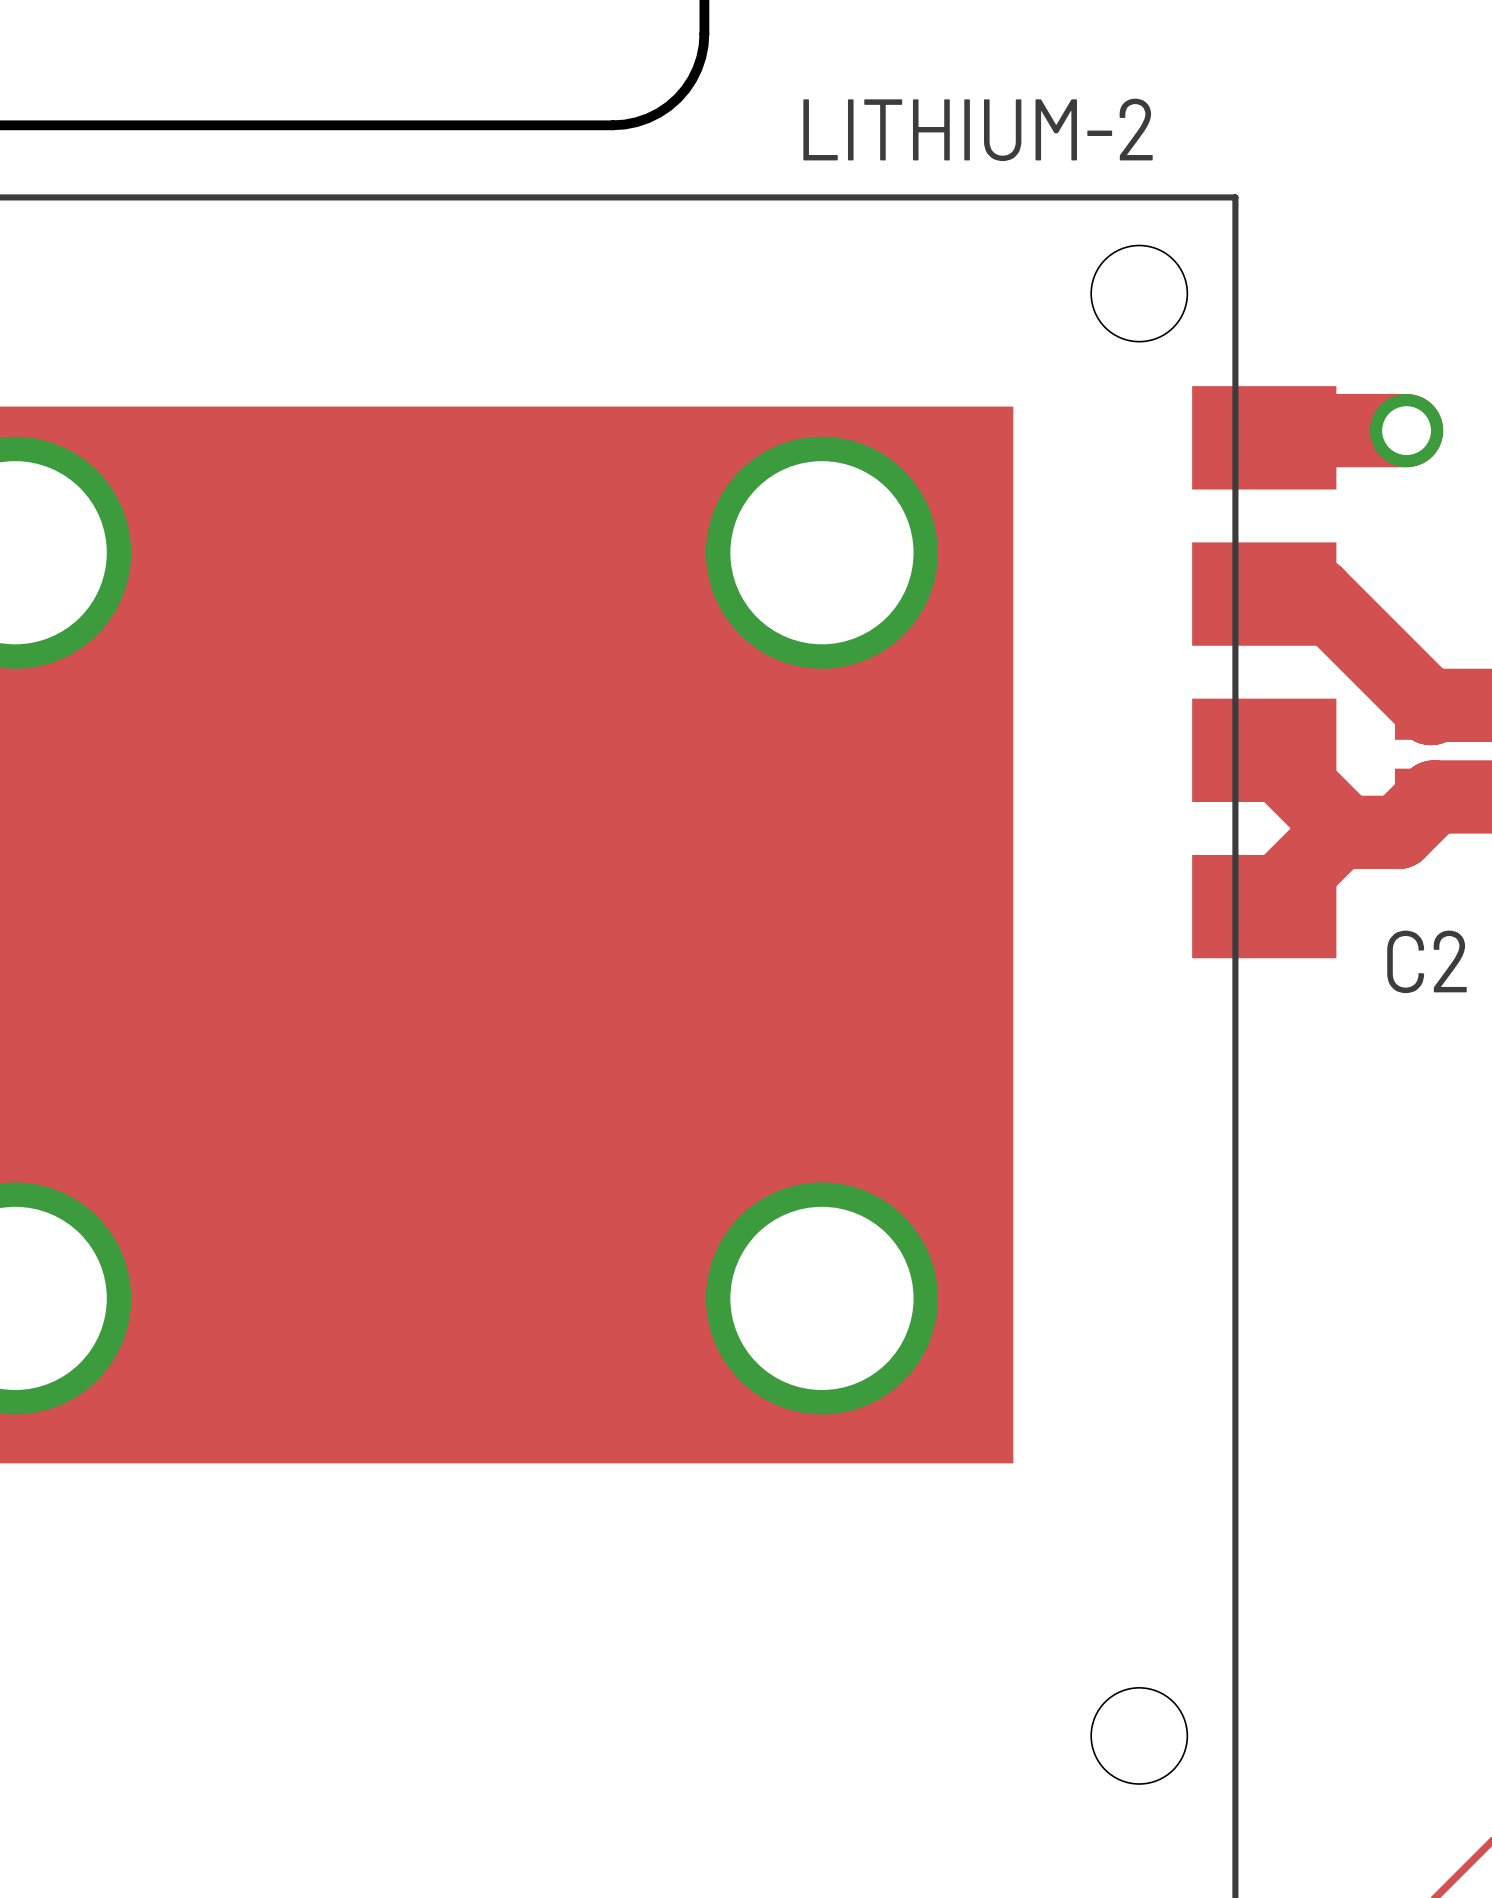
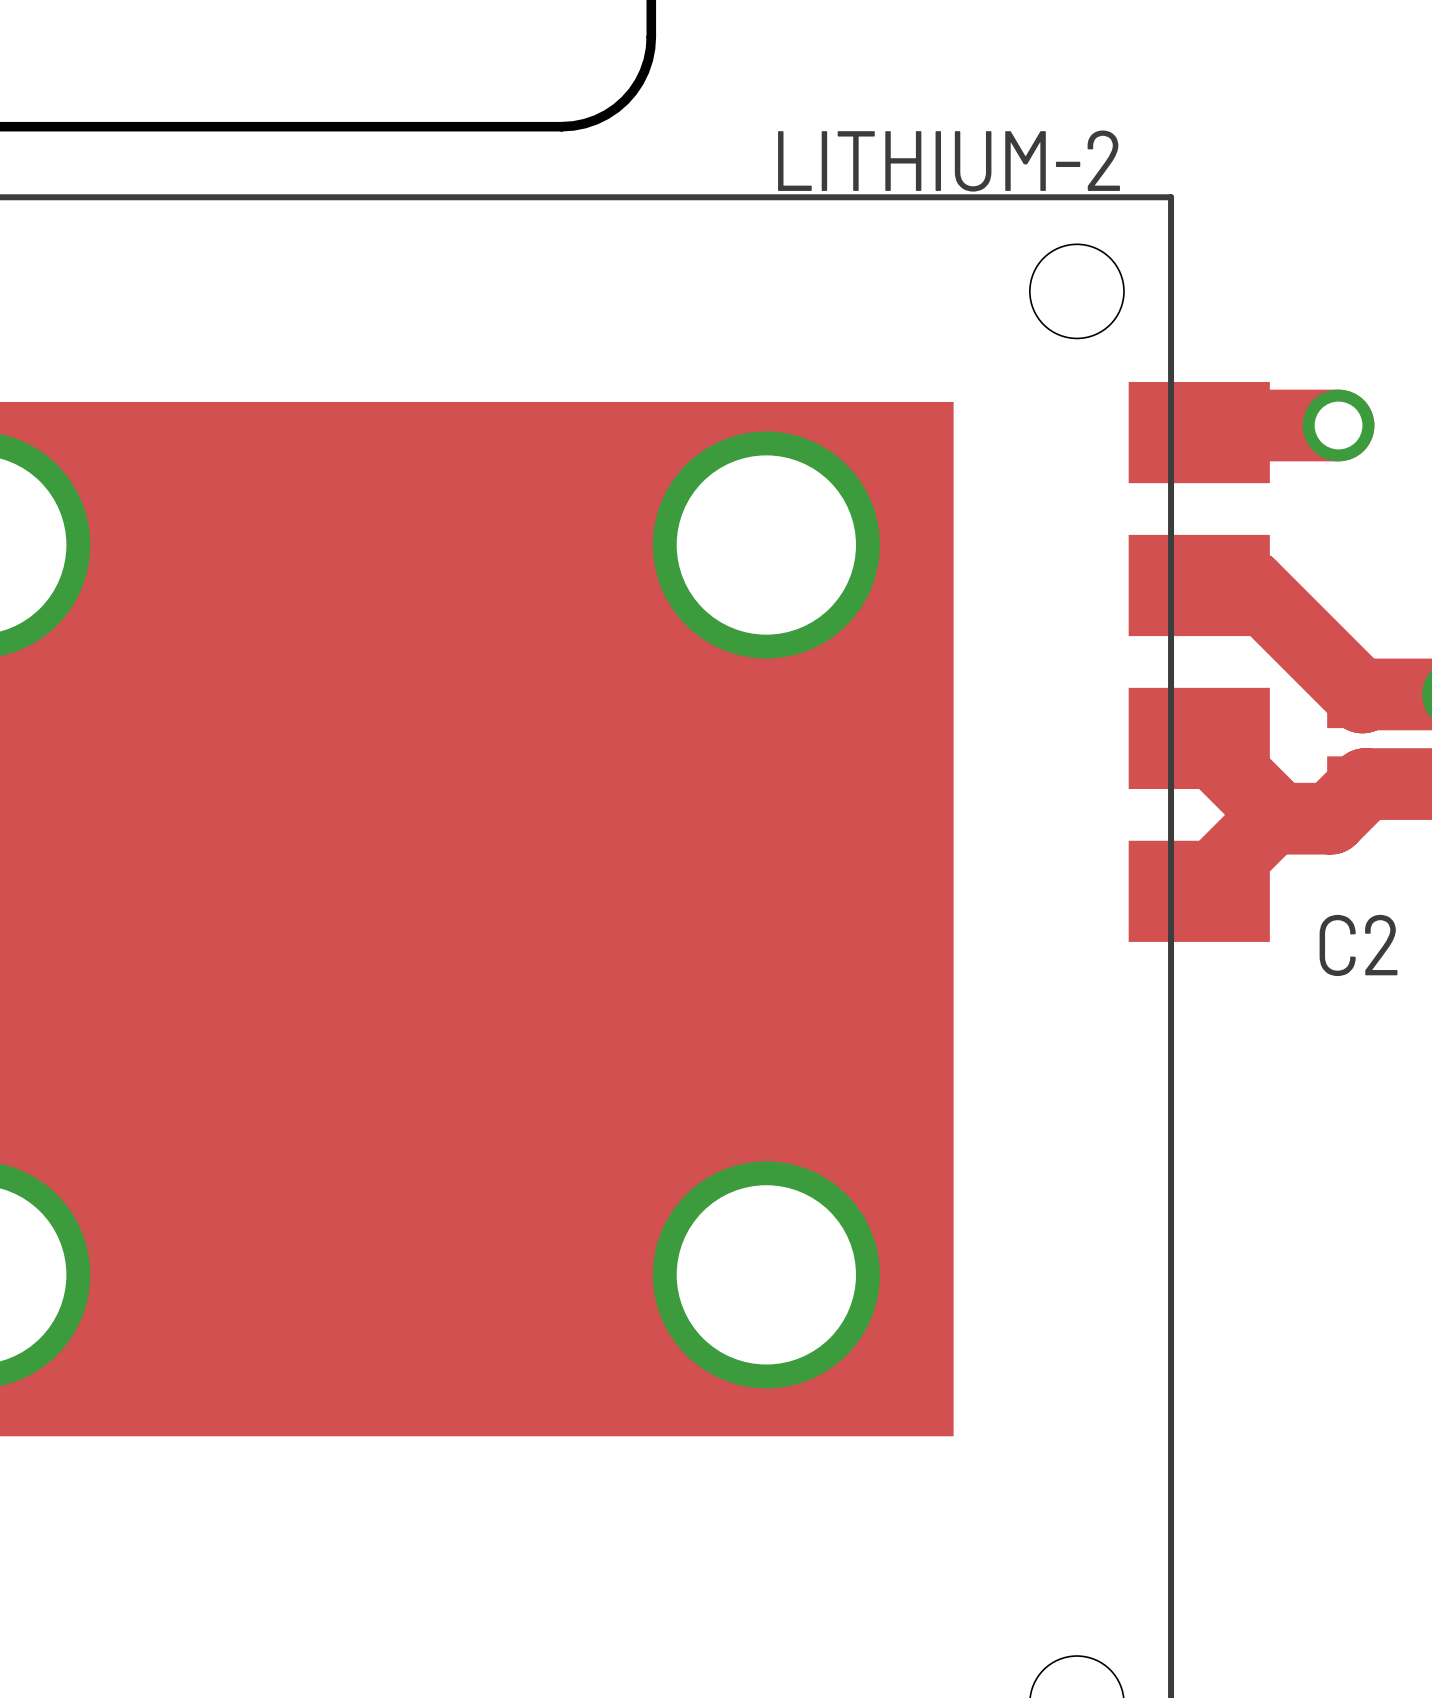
LITHIUM-2 name position: LITHIUM-2 (978, 129) -> LITHIUM-2 (949, 161)

